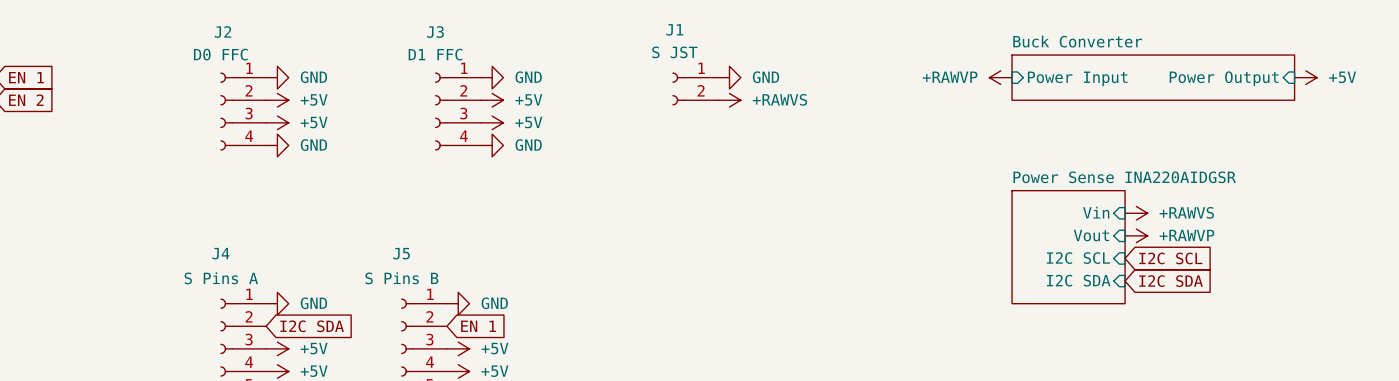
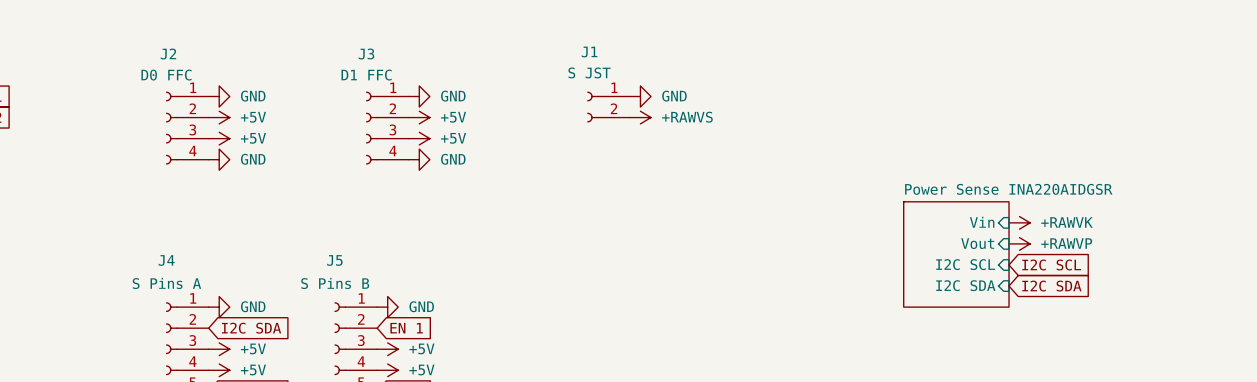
power symbol: +RAWVP (1000, 77) -> none
sheet Buck Converter: (1153, 77) -> none
power symbol: +5V (1305, 77) -> none
sheet pin: Power Input (1077, 78) -> none
sheet pin: Power Output (1224, 78) -> none
power symbol: +RAWVS (1136, 213) -> +RAWVK (1019, 222)

